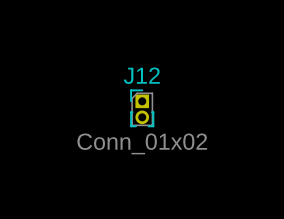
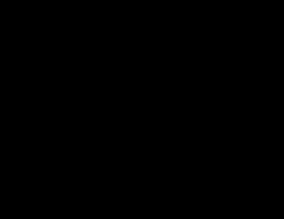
J12: Conn_01x02 (142, 108) -> none

